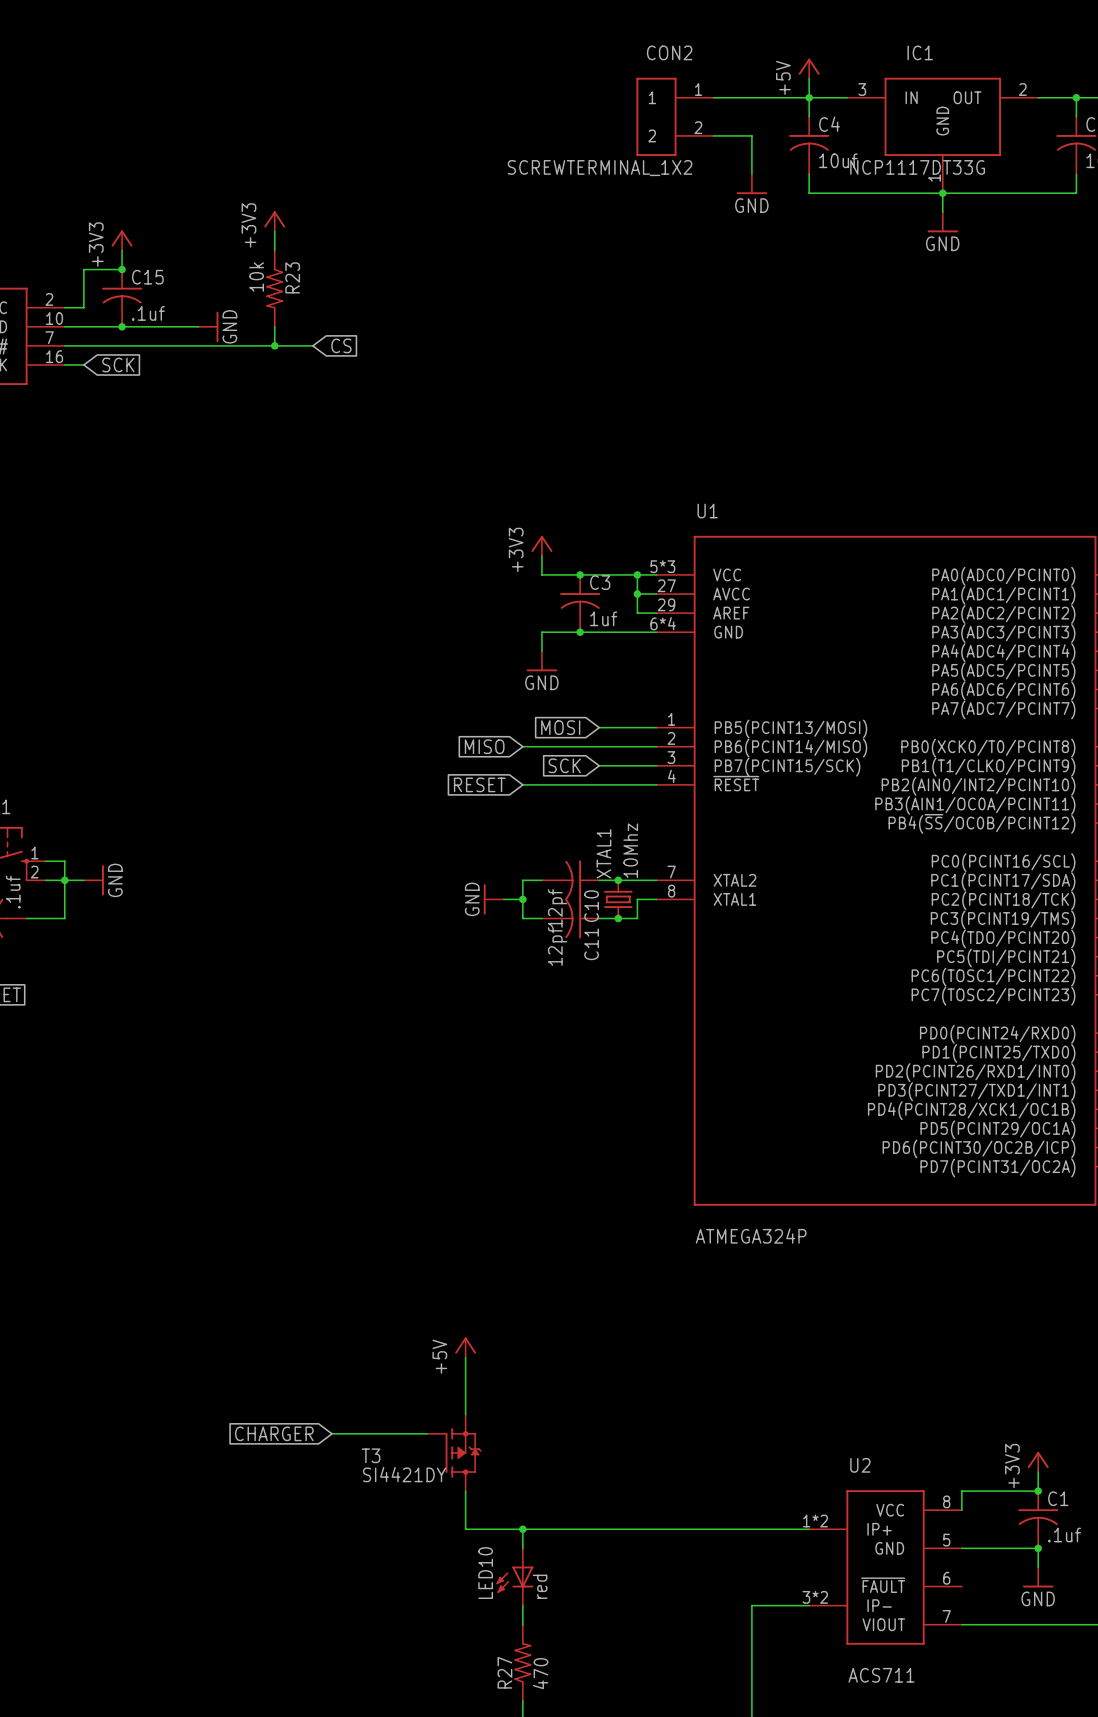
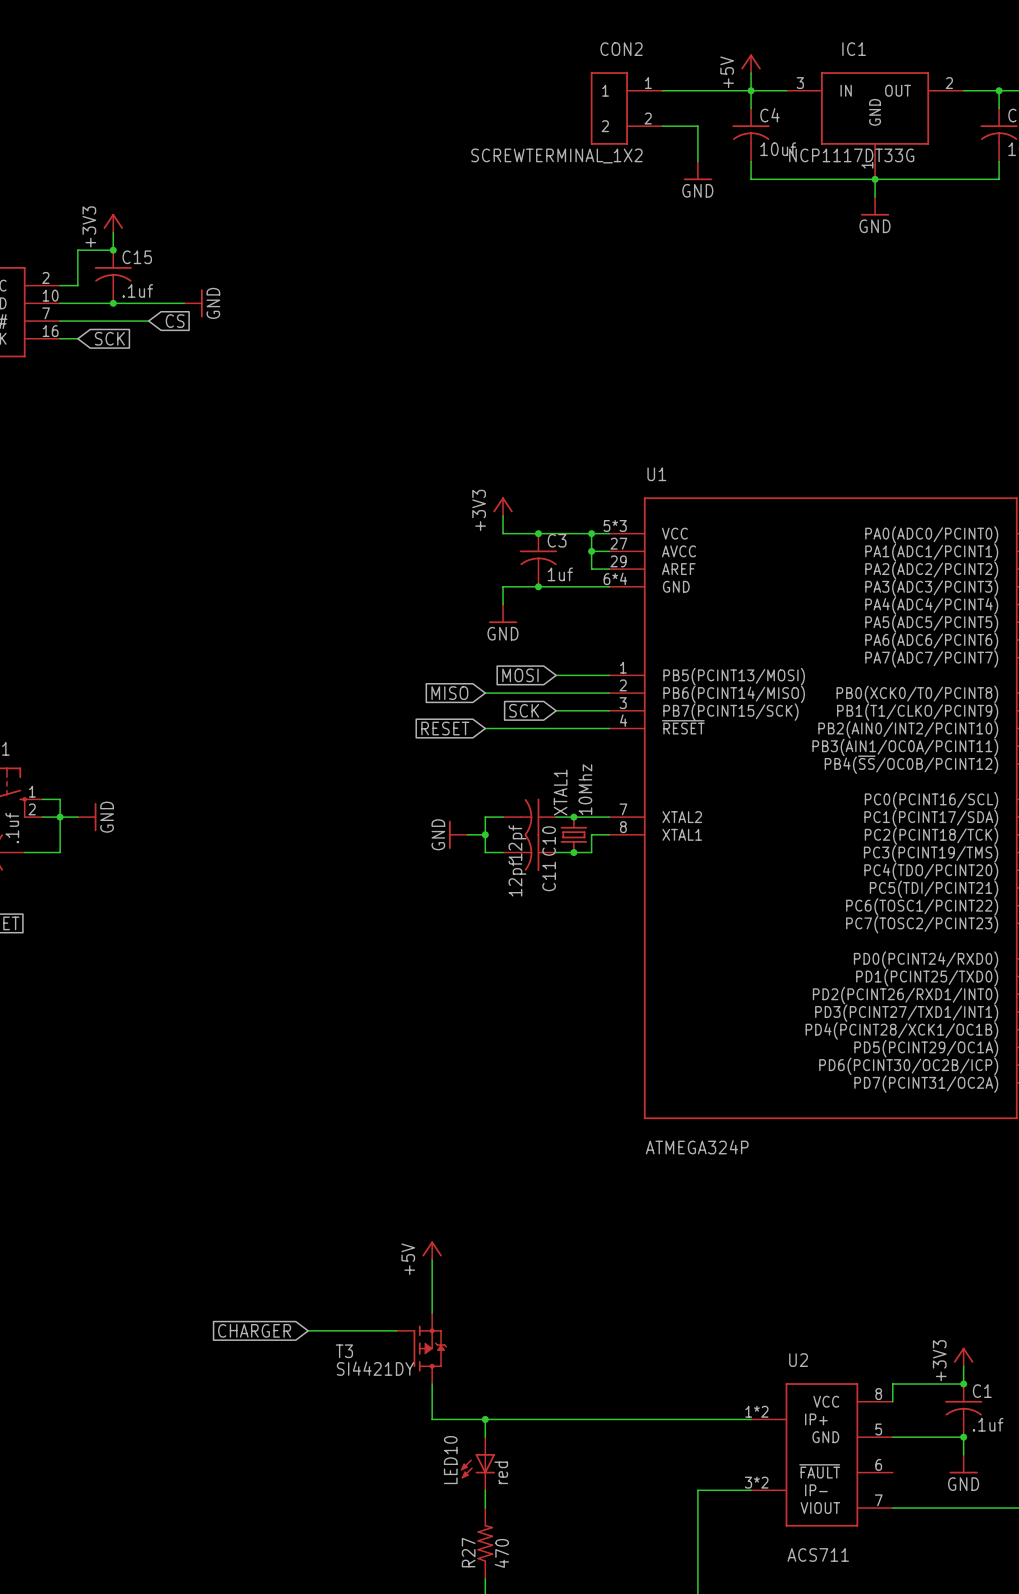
power symbol: +3V3 (274, 221) -> none
wire: (274, 231) (274, 250) -> none
R23: 10k (274, 288) -> none
wire: (274, 326) (274, 345) -> none
wire: (160, 345) (312, 345) -> none
junction: (274, 345) -> none
global label position: CS (341, 345) -> CS (175, 321)

